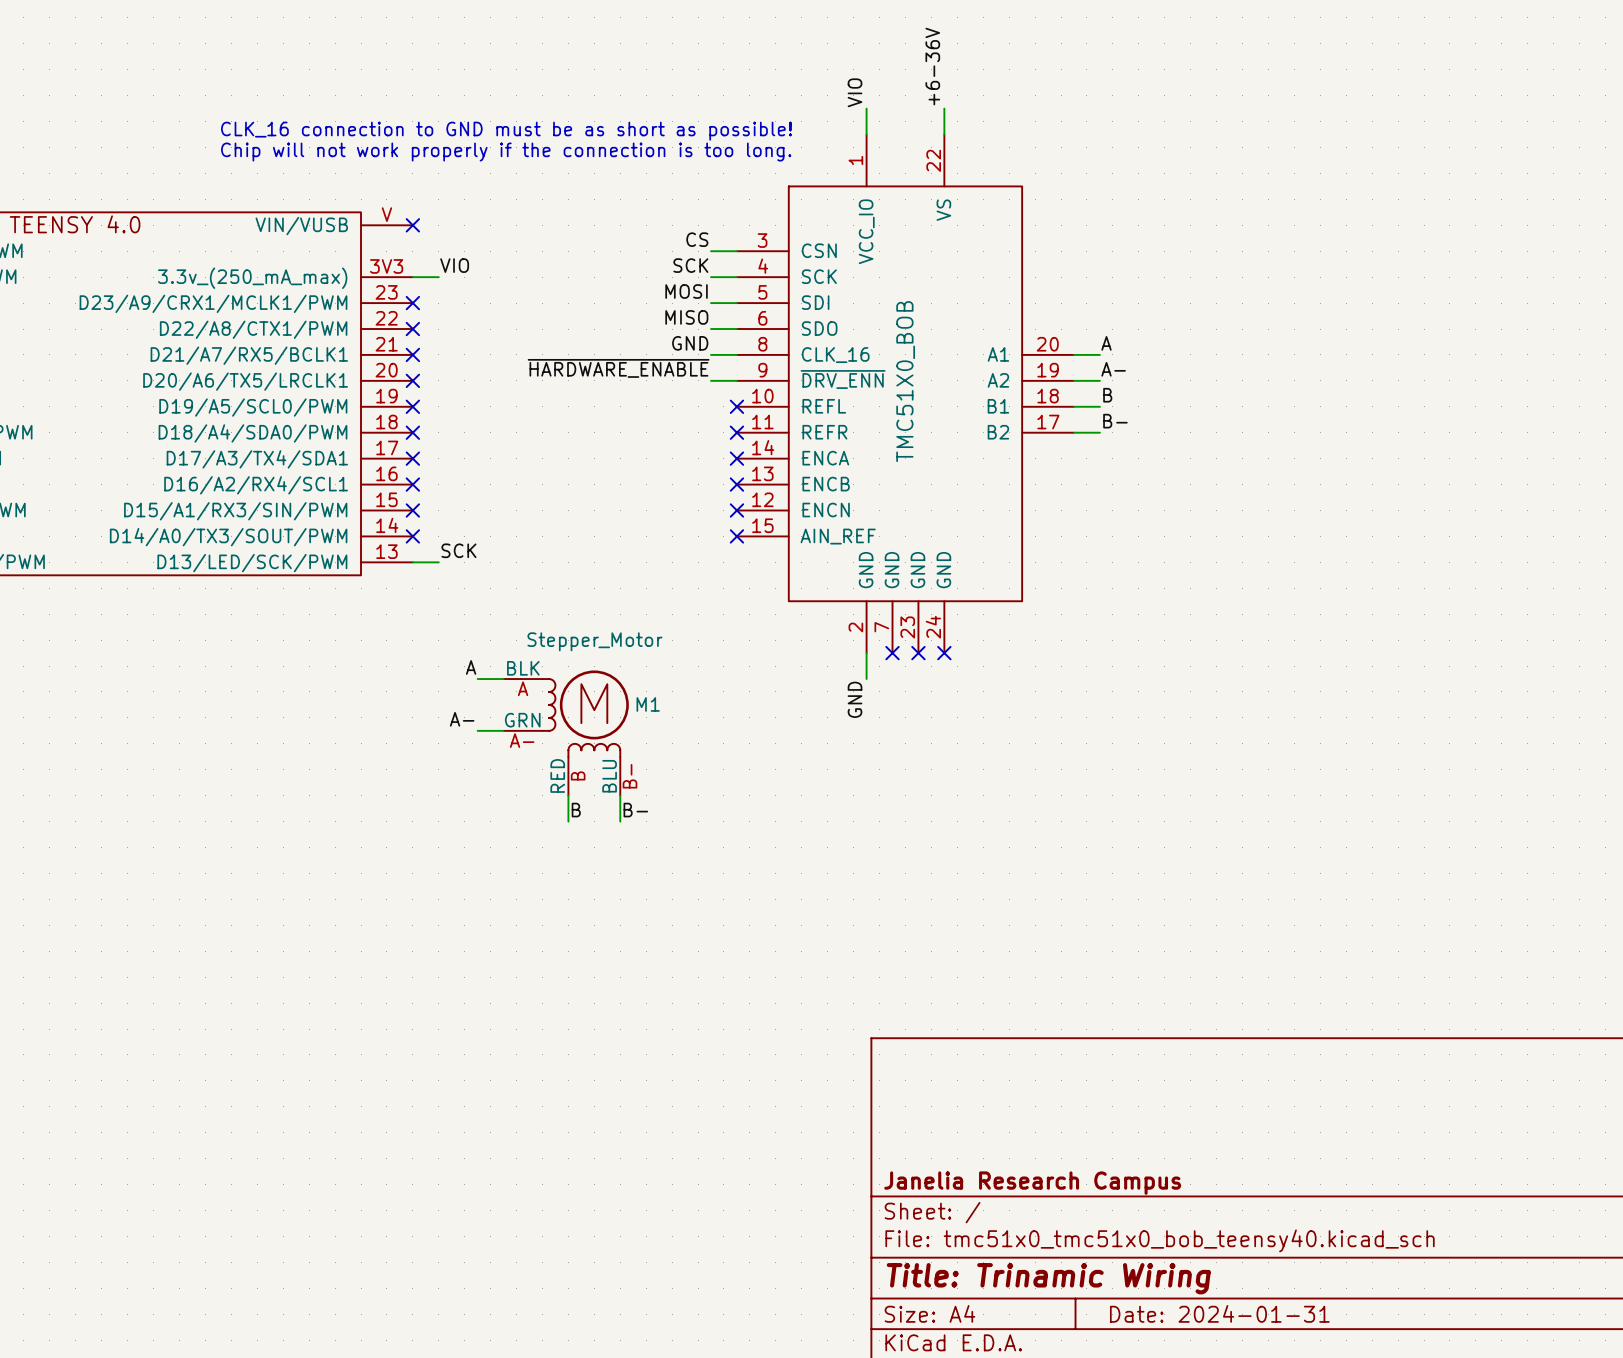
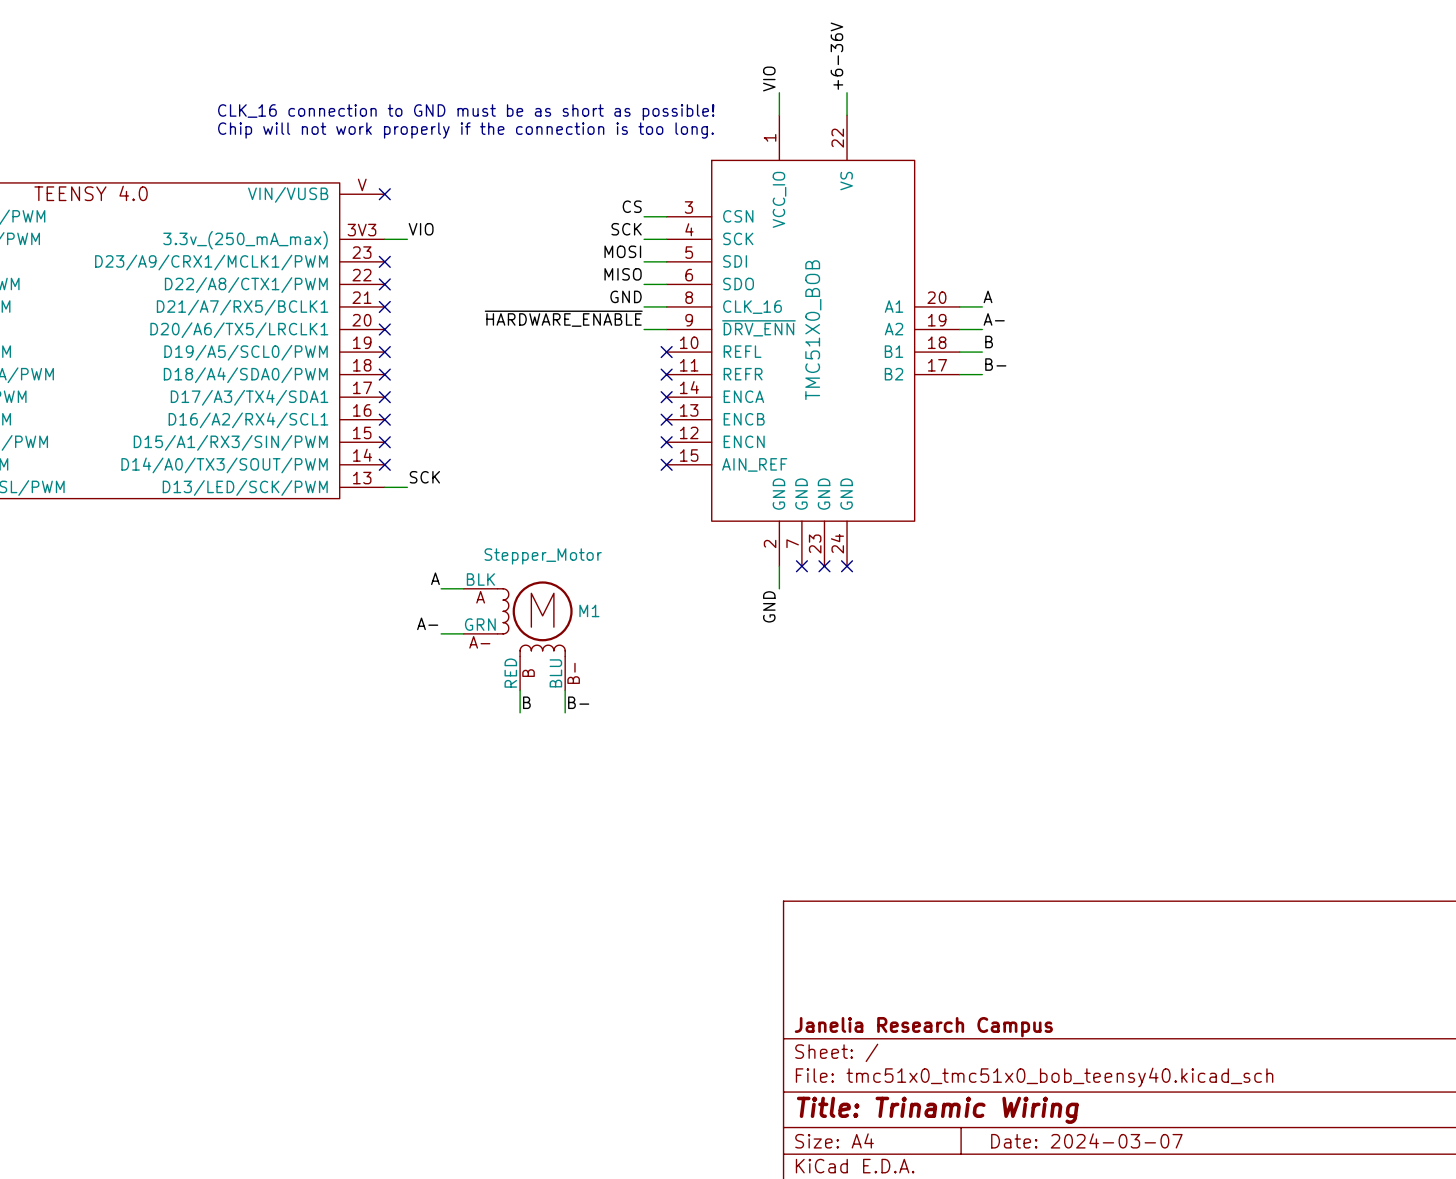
title block: Date: 2024-01-31 (1219, 1313) -> Date: 2024-03-07 (1086, 1140)

